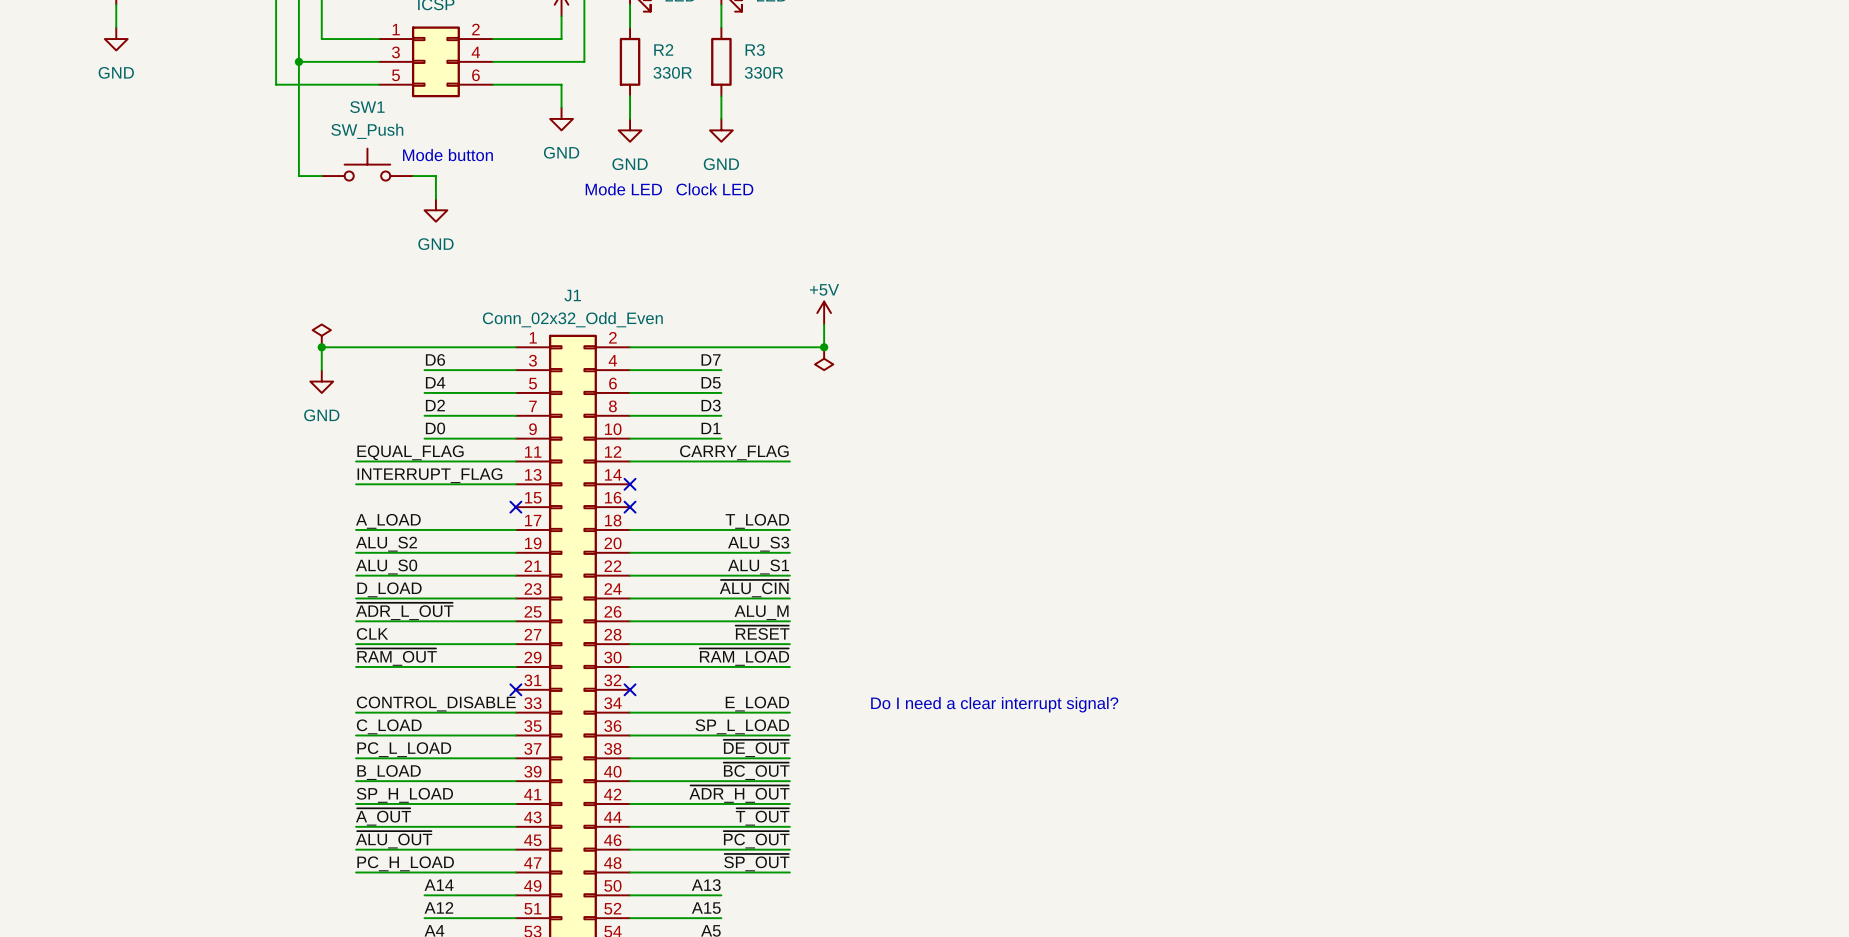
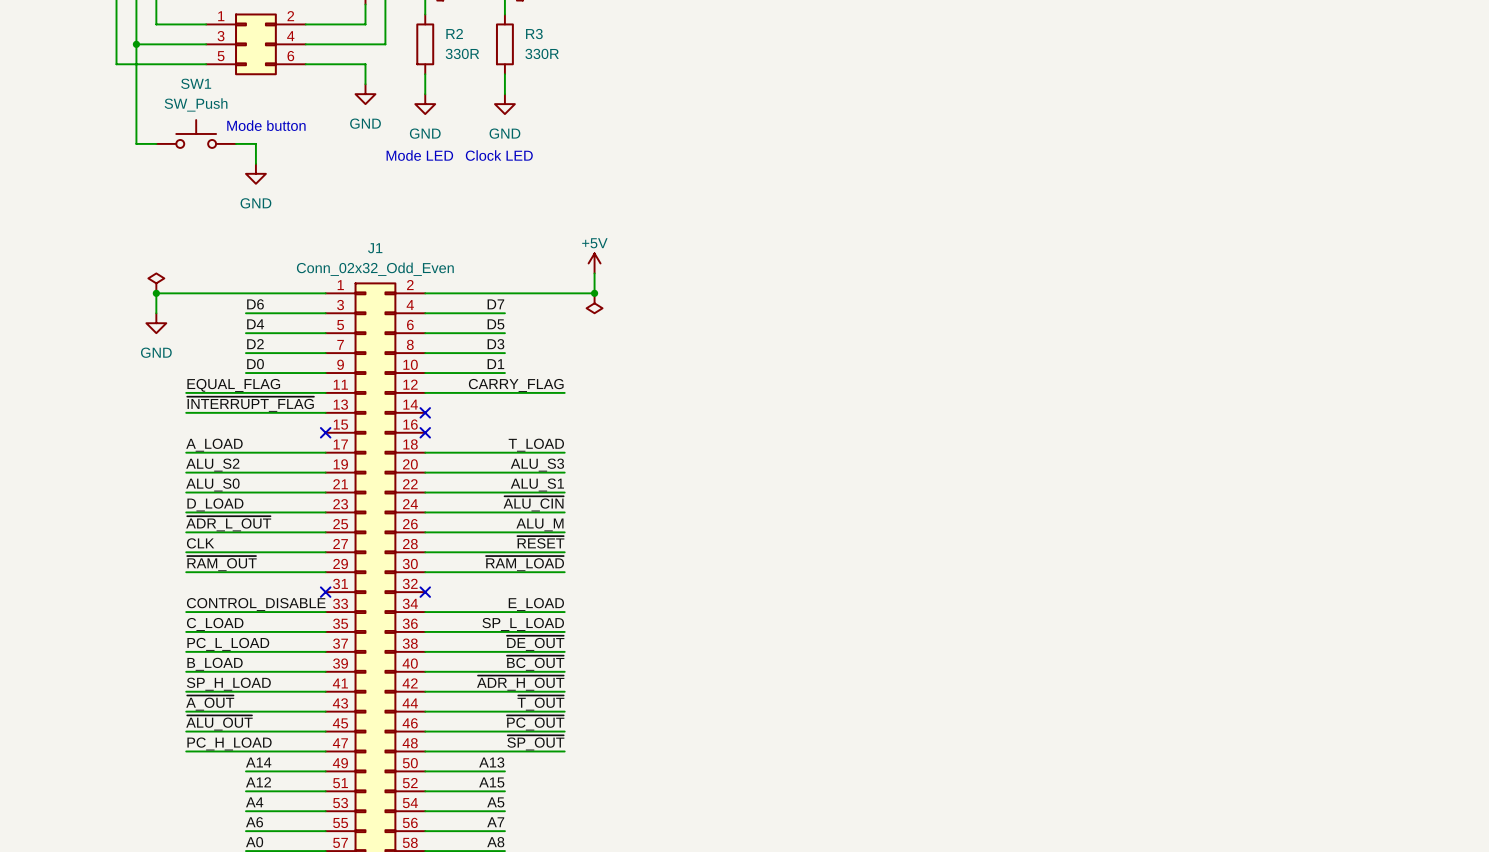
label: INTERRUPT_FLAG (429, 475) -> ~{INTERRUPT_FLAG} (250, 404)
text: Do I need a clear interrupt signal? (994, 704) -> none

